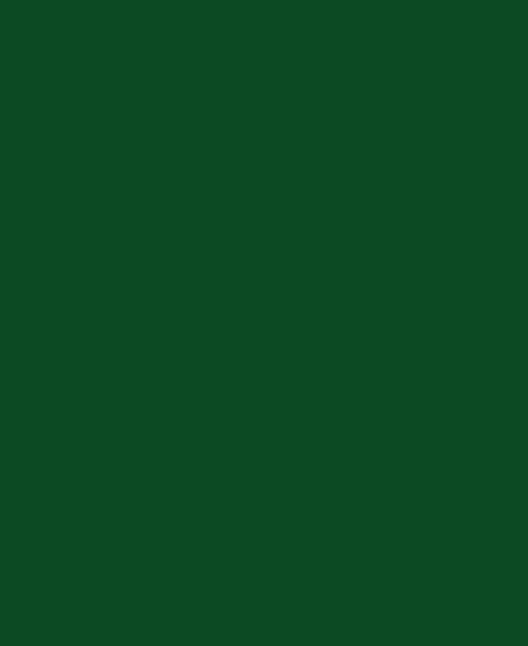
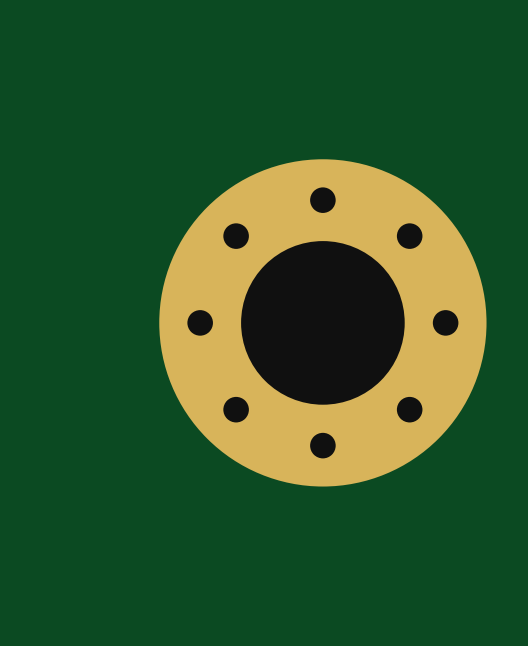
part: none -> (322, 322)

